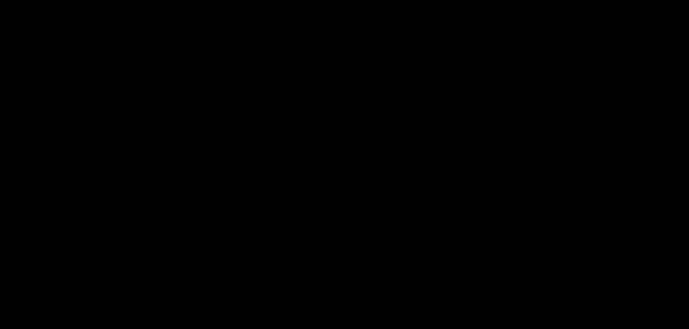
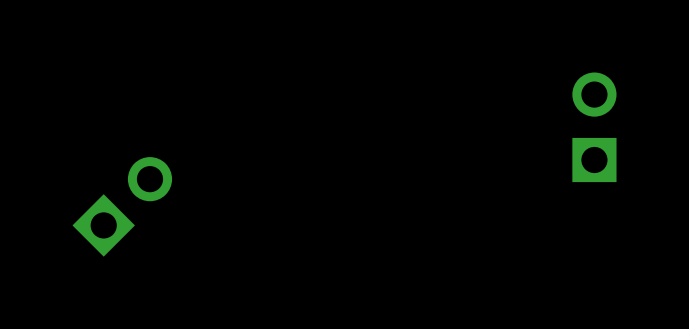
part: none -> (594, 127)
part: none -> (122, 206)

